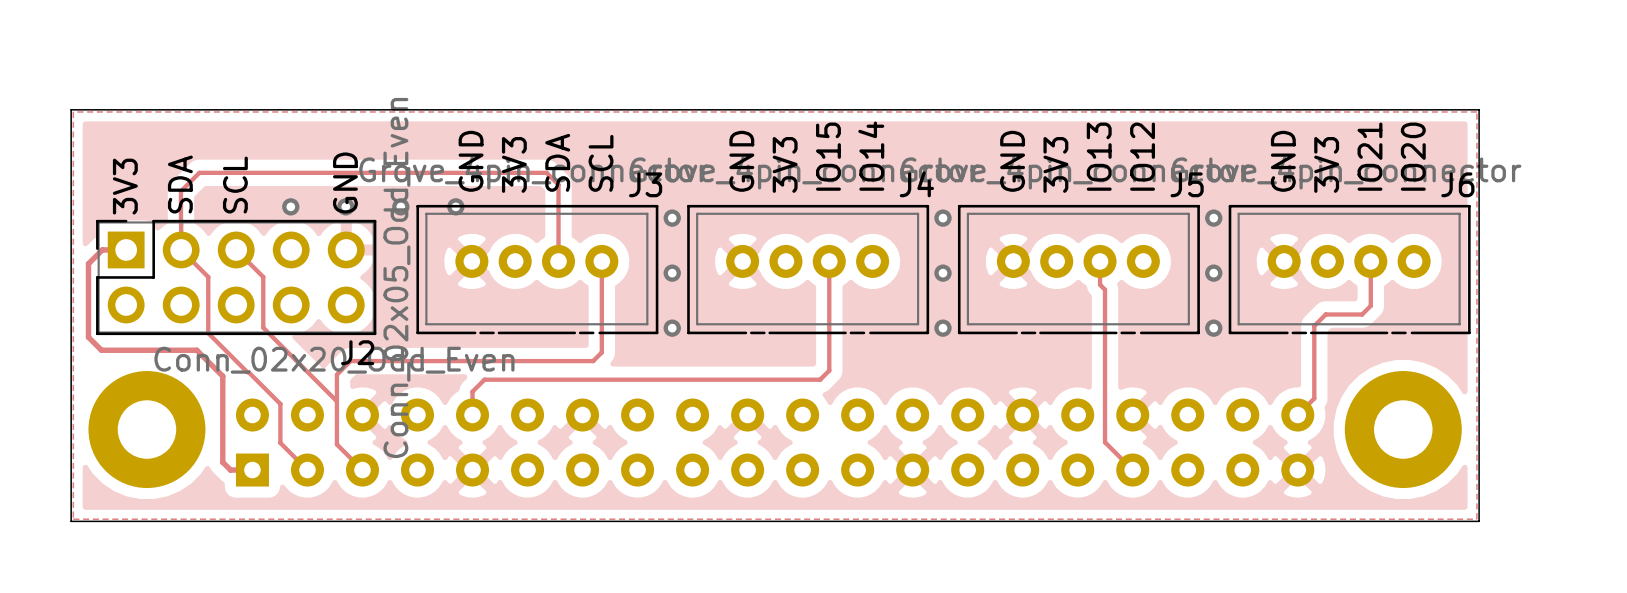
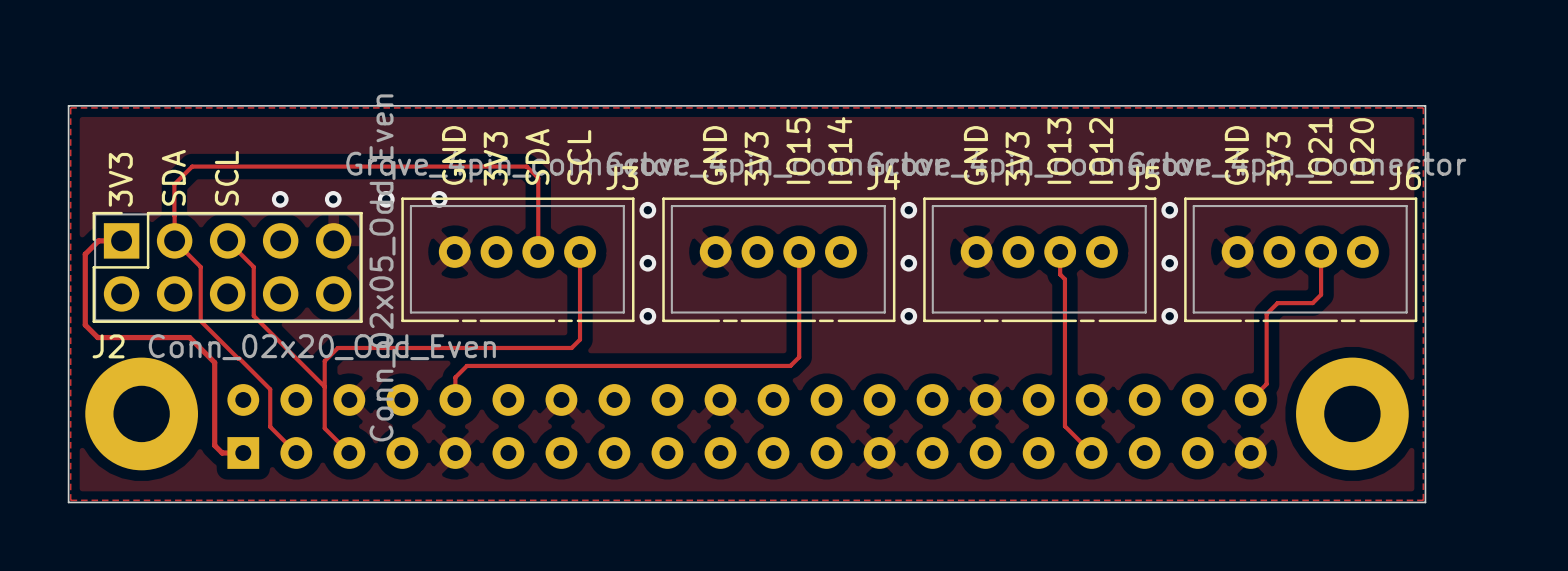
text: GND (345, 182) -> none
J2 name position: J2 (357, 352) -> J2 (108, 346)

